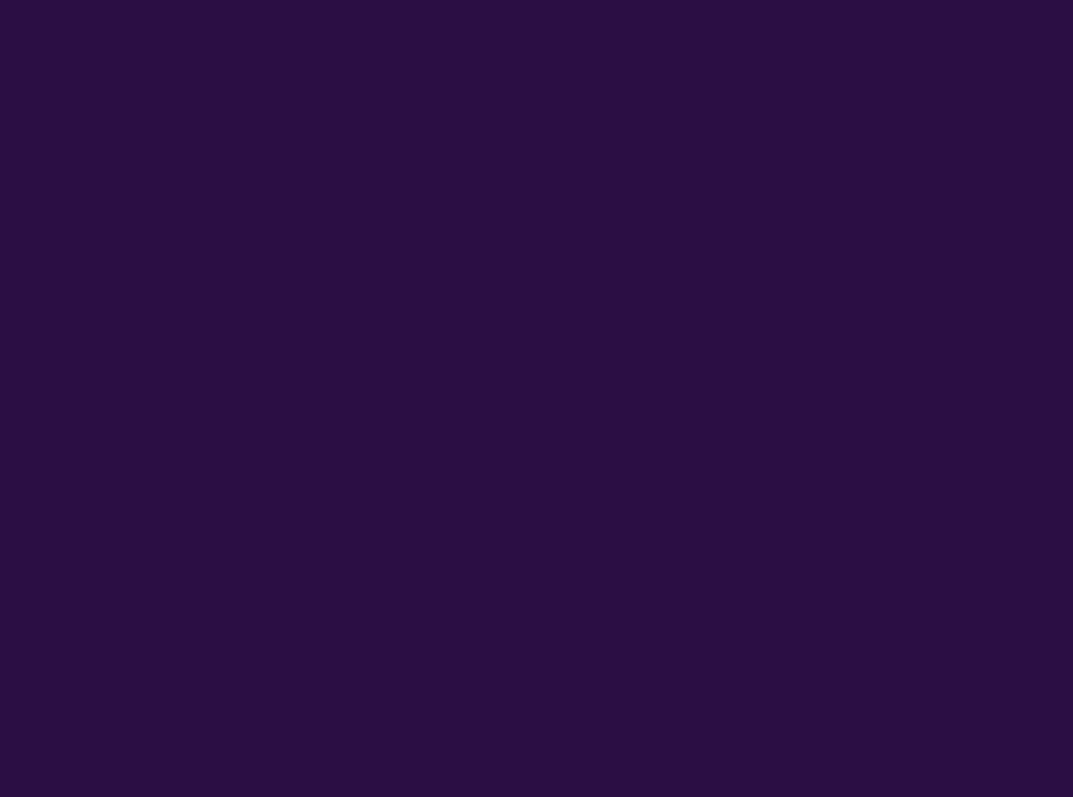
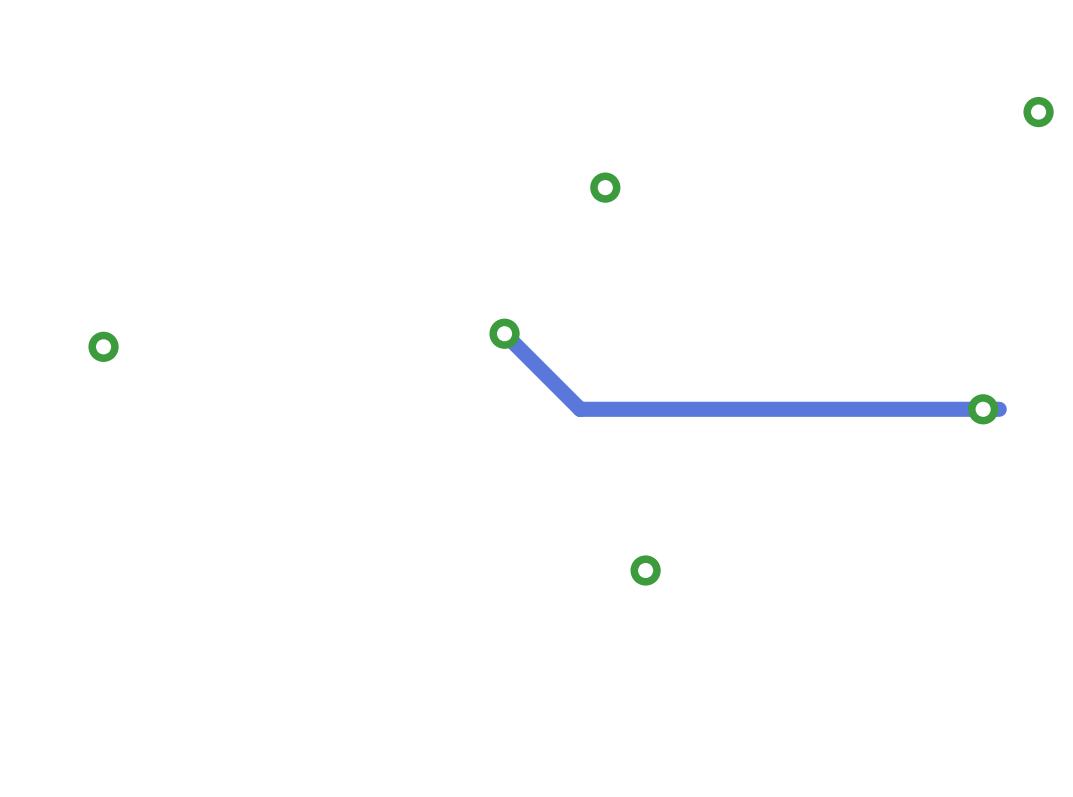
via: none -> (1038, 112)
via: none -> (605, 187)
track: none -> (504, 333) (580, 409) (999, 409)
via: none -> (504, 333)
via: none -> (103, 346)
via: none -> (983, 409)
via: none -> (645, 570)

